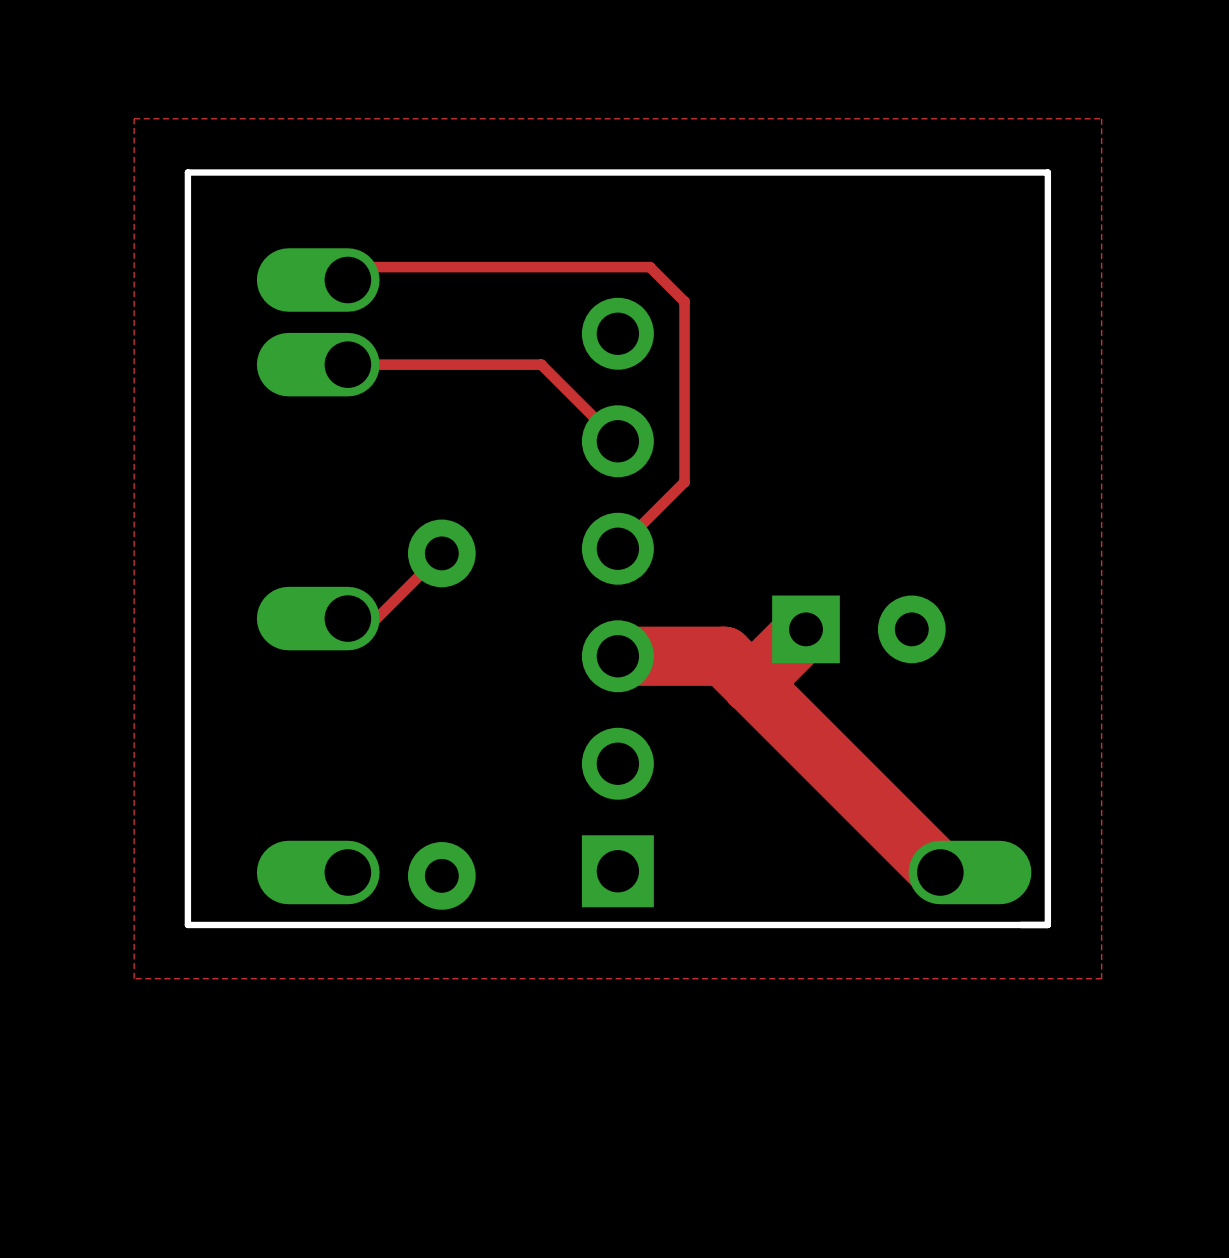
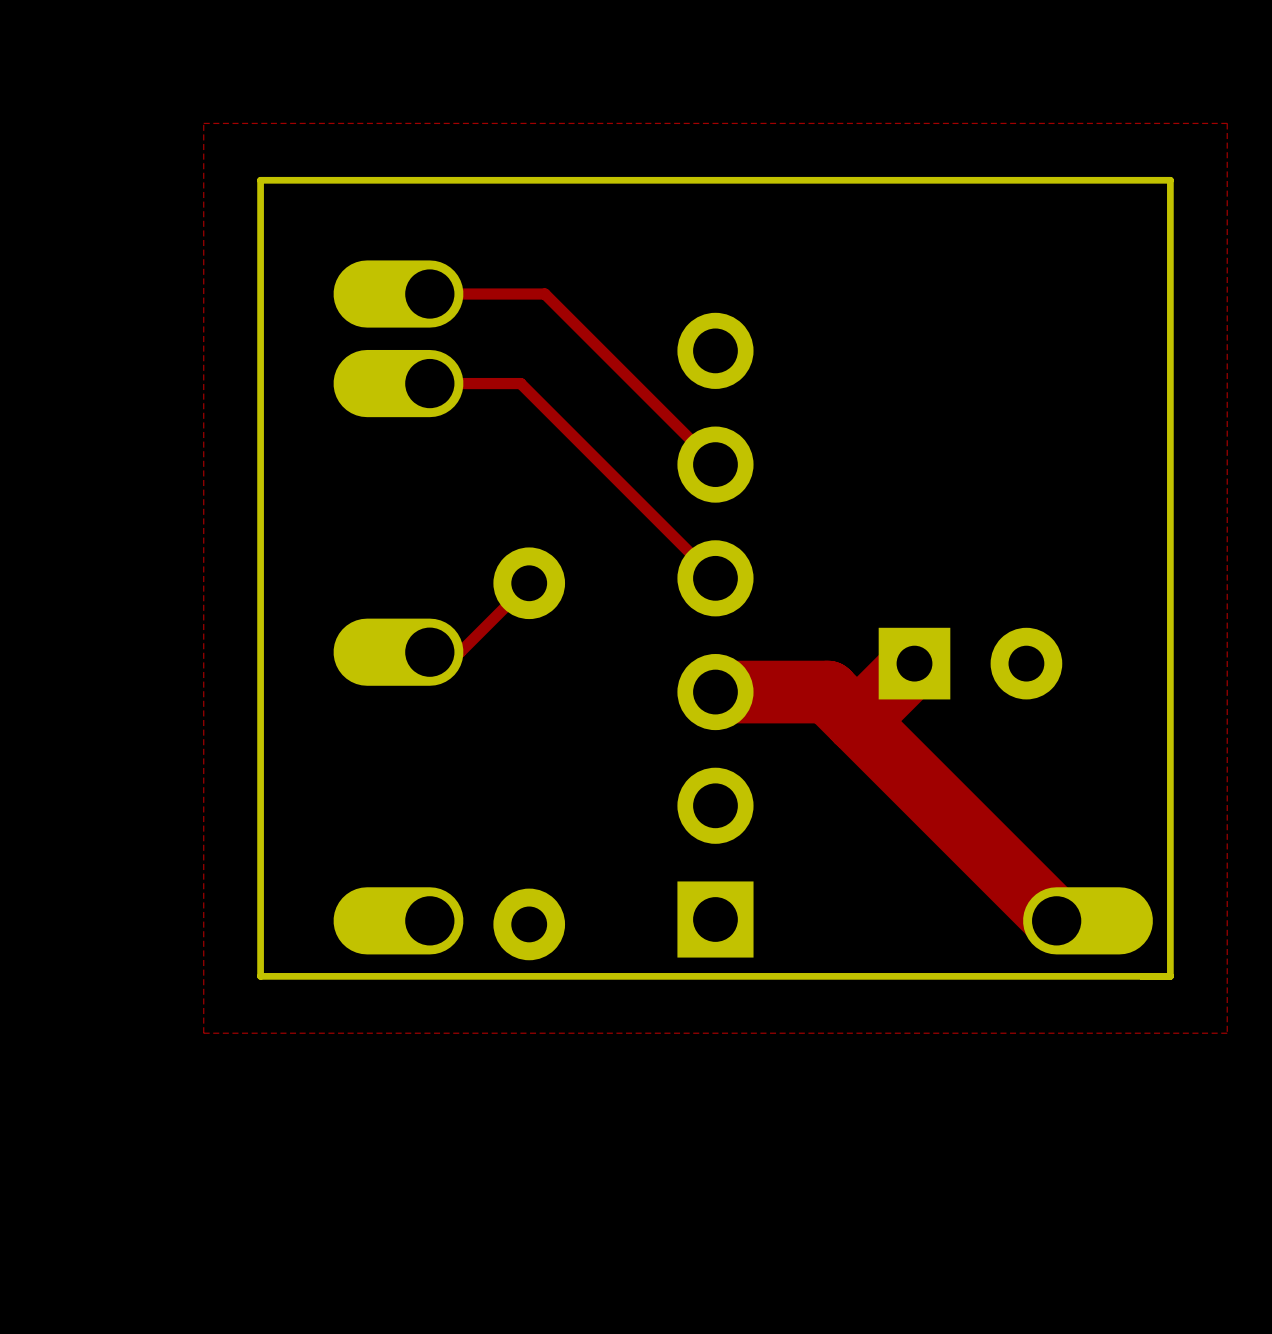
top track: (360, 267) (649, 267) (684, 301) (684, 482) (617, 548) -> (520, 383) (715, 578)
top track: (541, 364) (433, 364) -> (634, 383) (544, 294) (429, 294)

